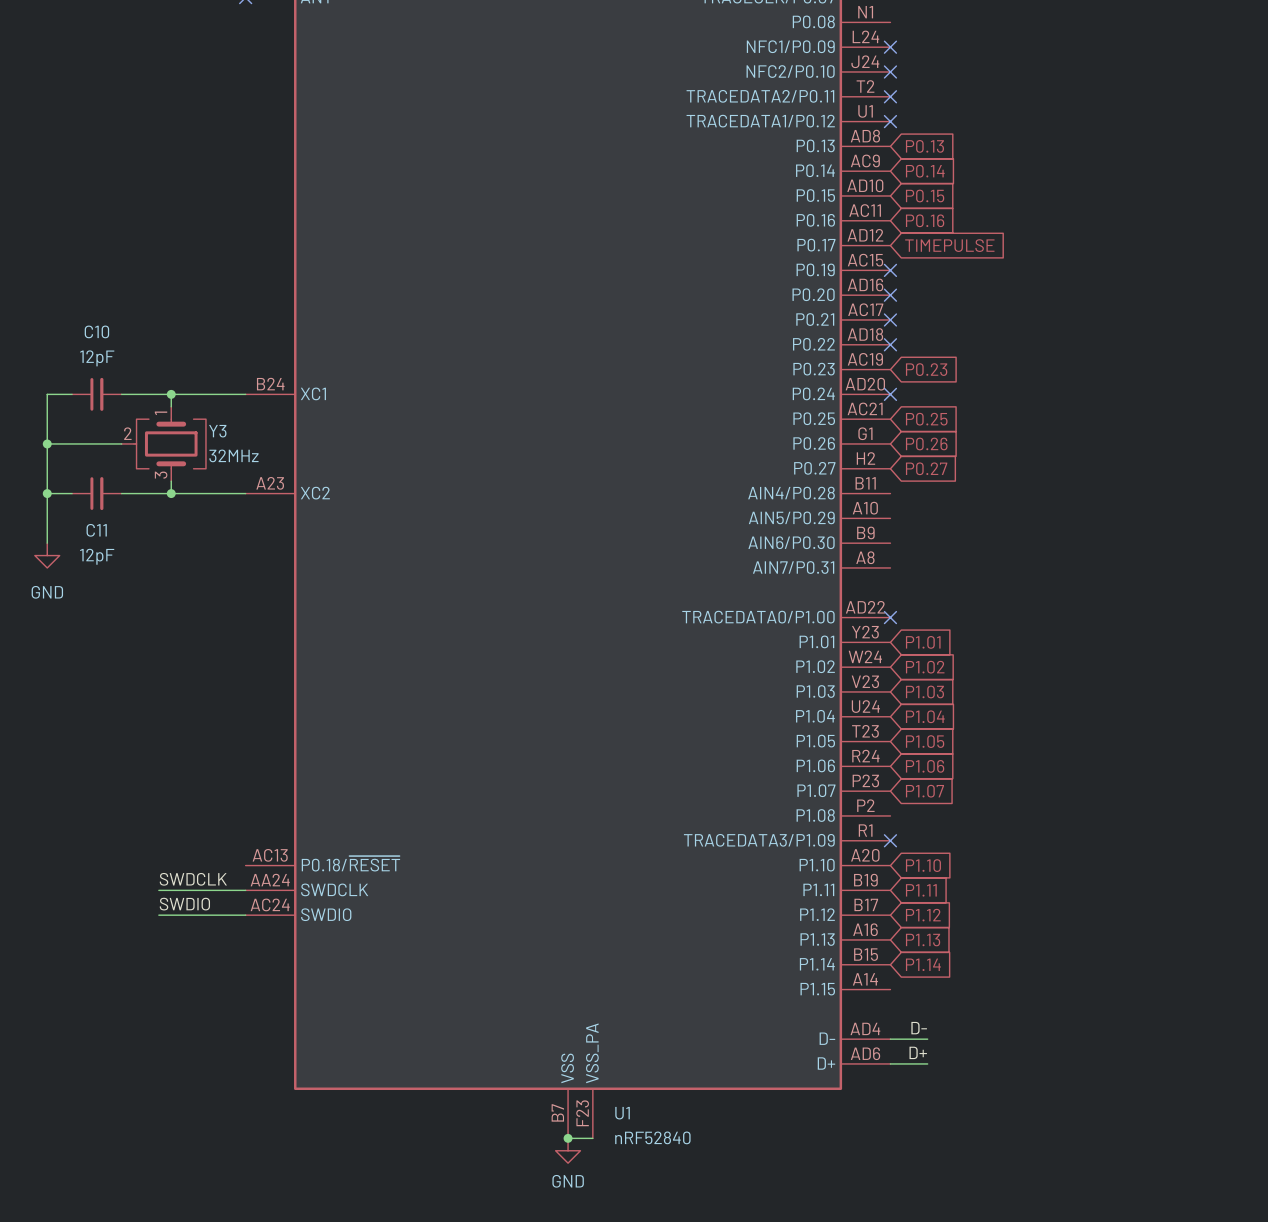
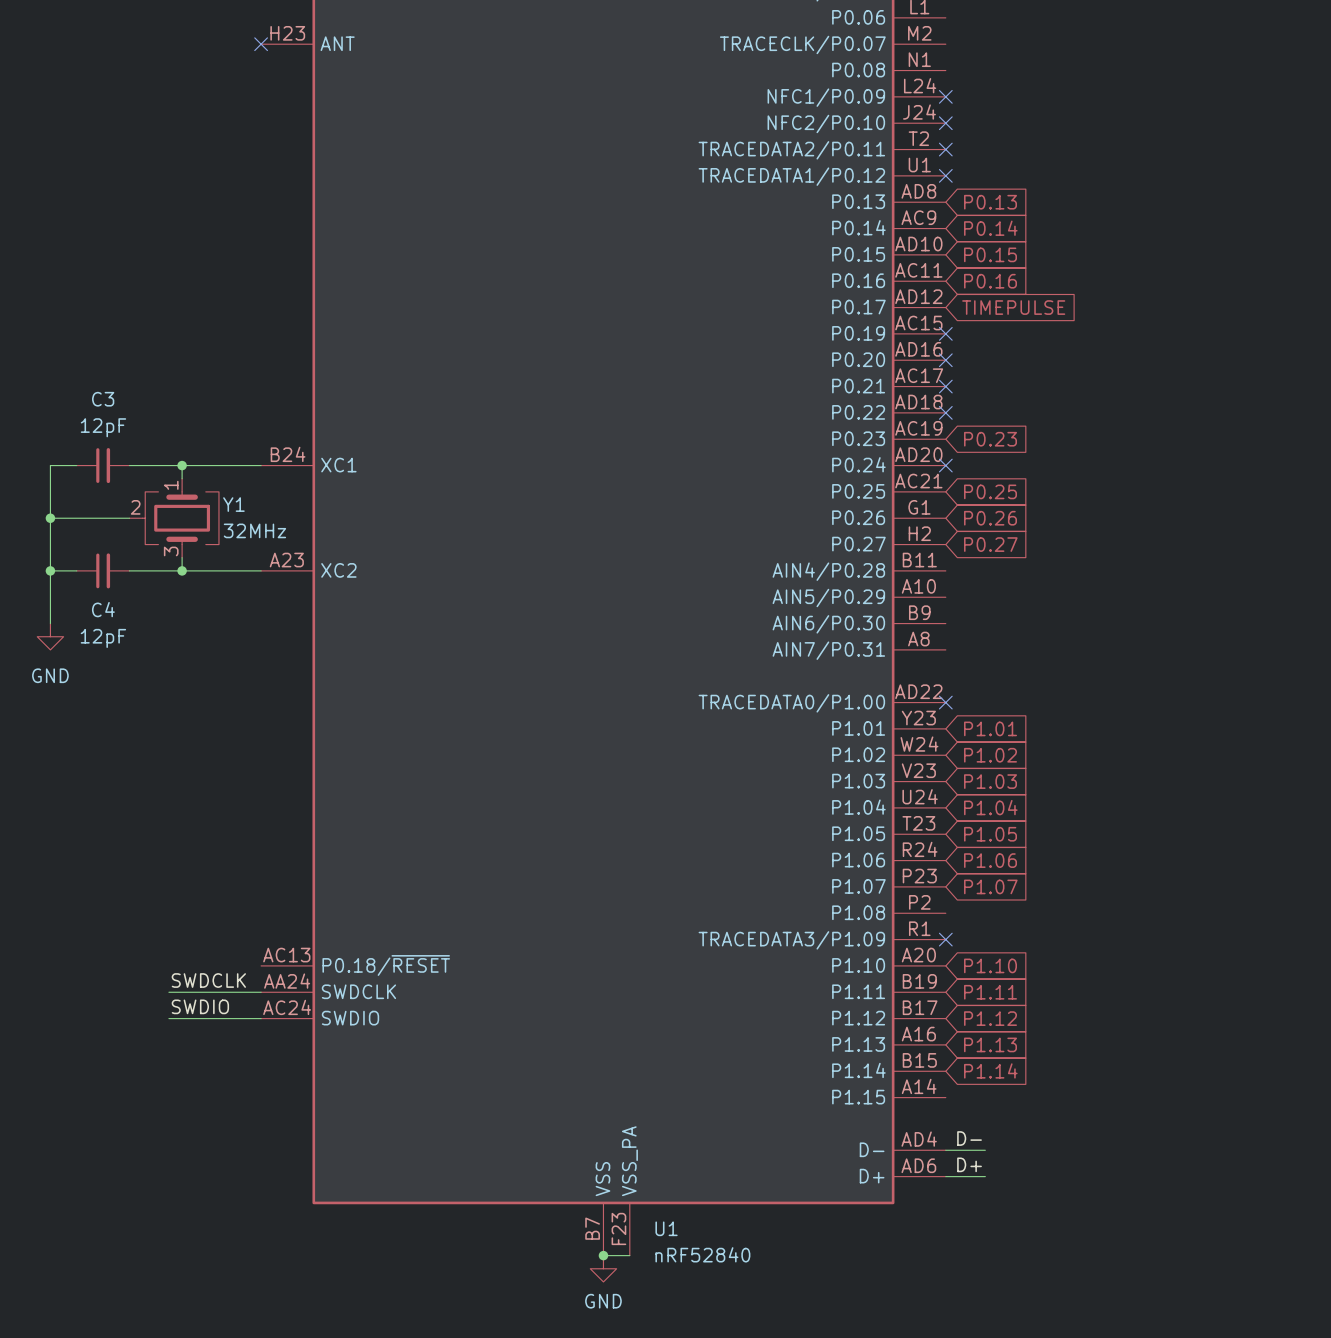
C10 name: C10 (96, 331) -> C3 (103, 399)
Y3 name: Y3 (217, 431) -> Y1 (233, 504)
C11 name: C11 (96, 530) -> C4 (103, 609)

